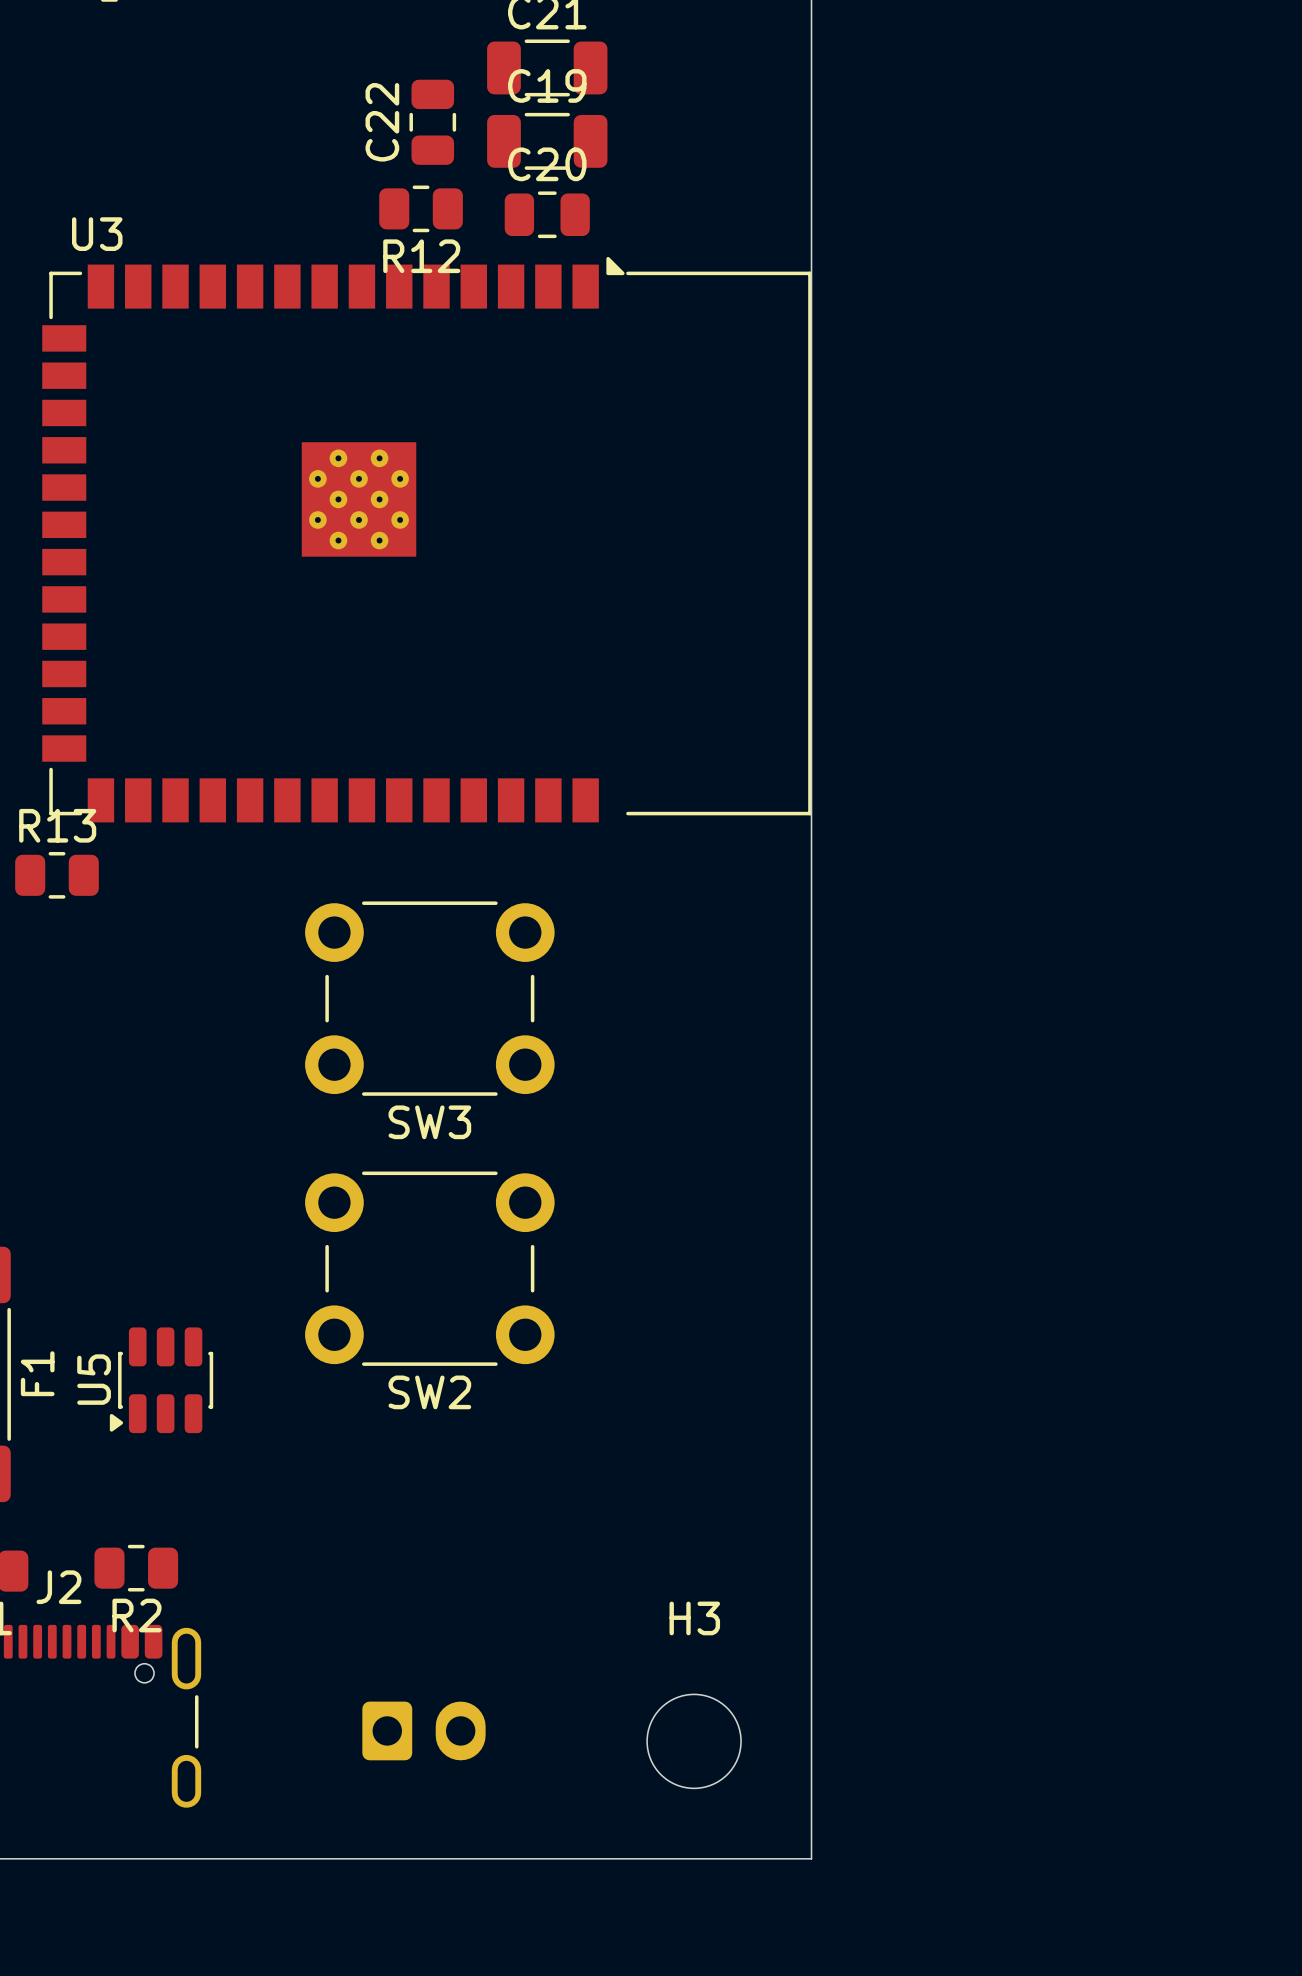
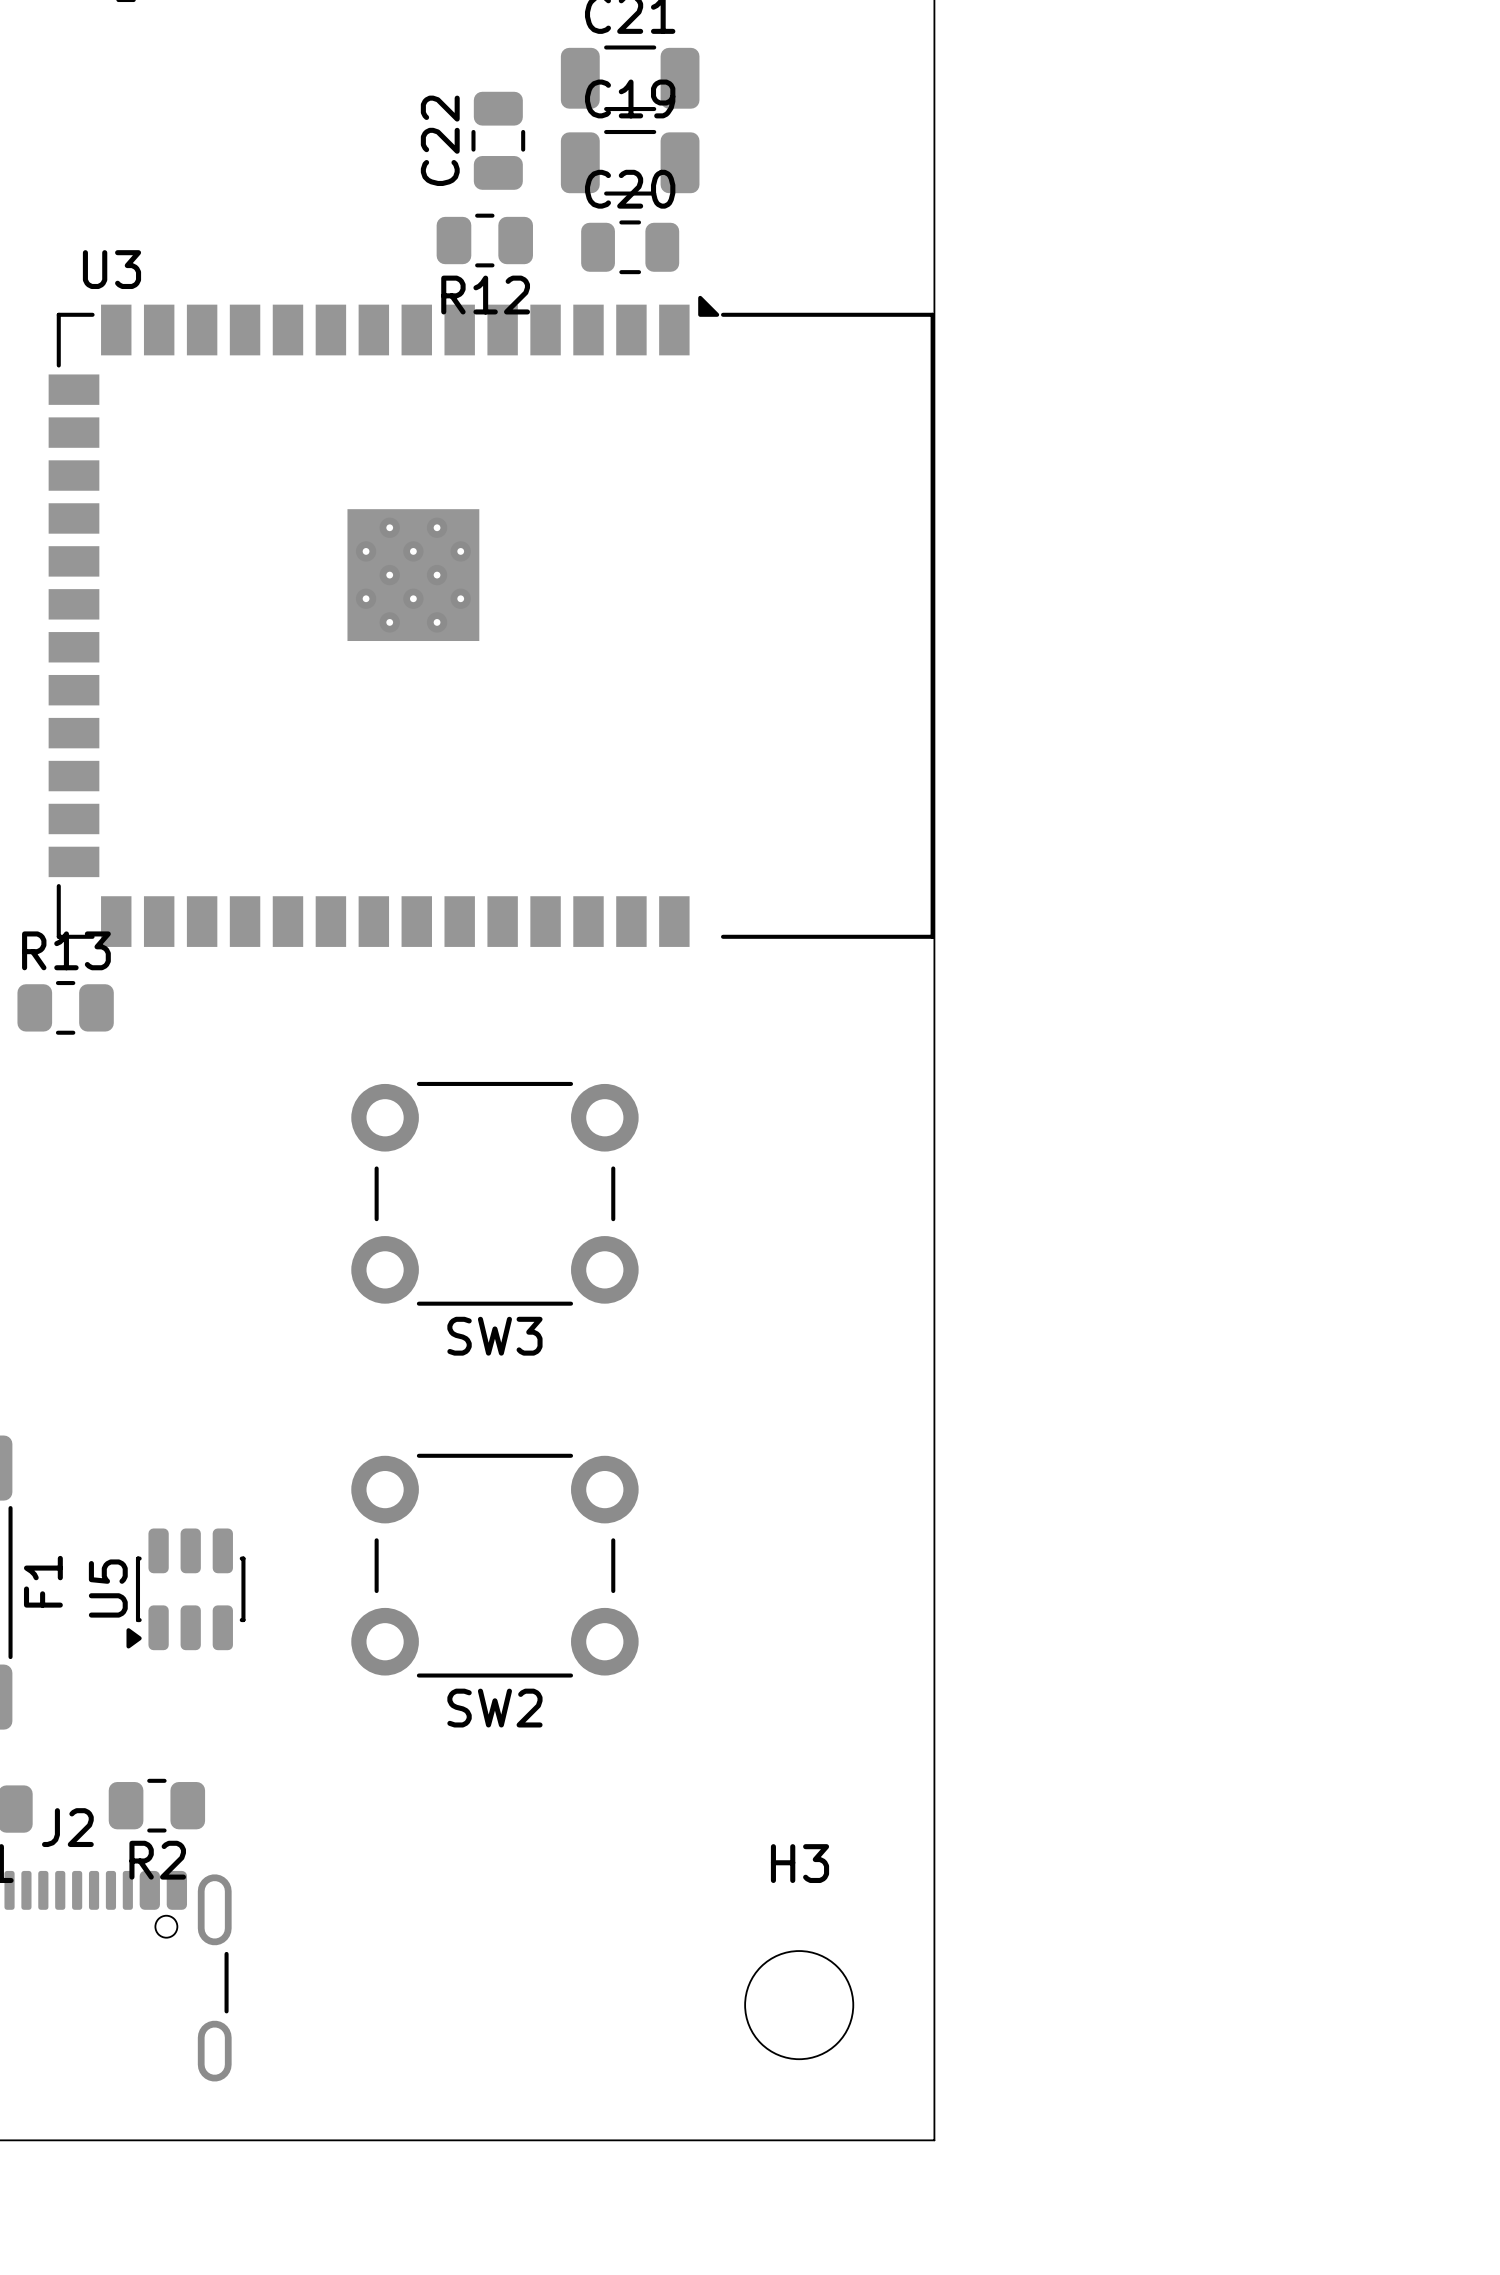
SW3 position: (429, 998) -> (494, 1193)
SW2 position: (429, 1268) -> (494, 1565)
part: (423, 1730) -> none

